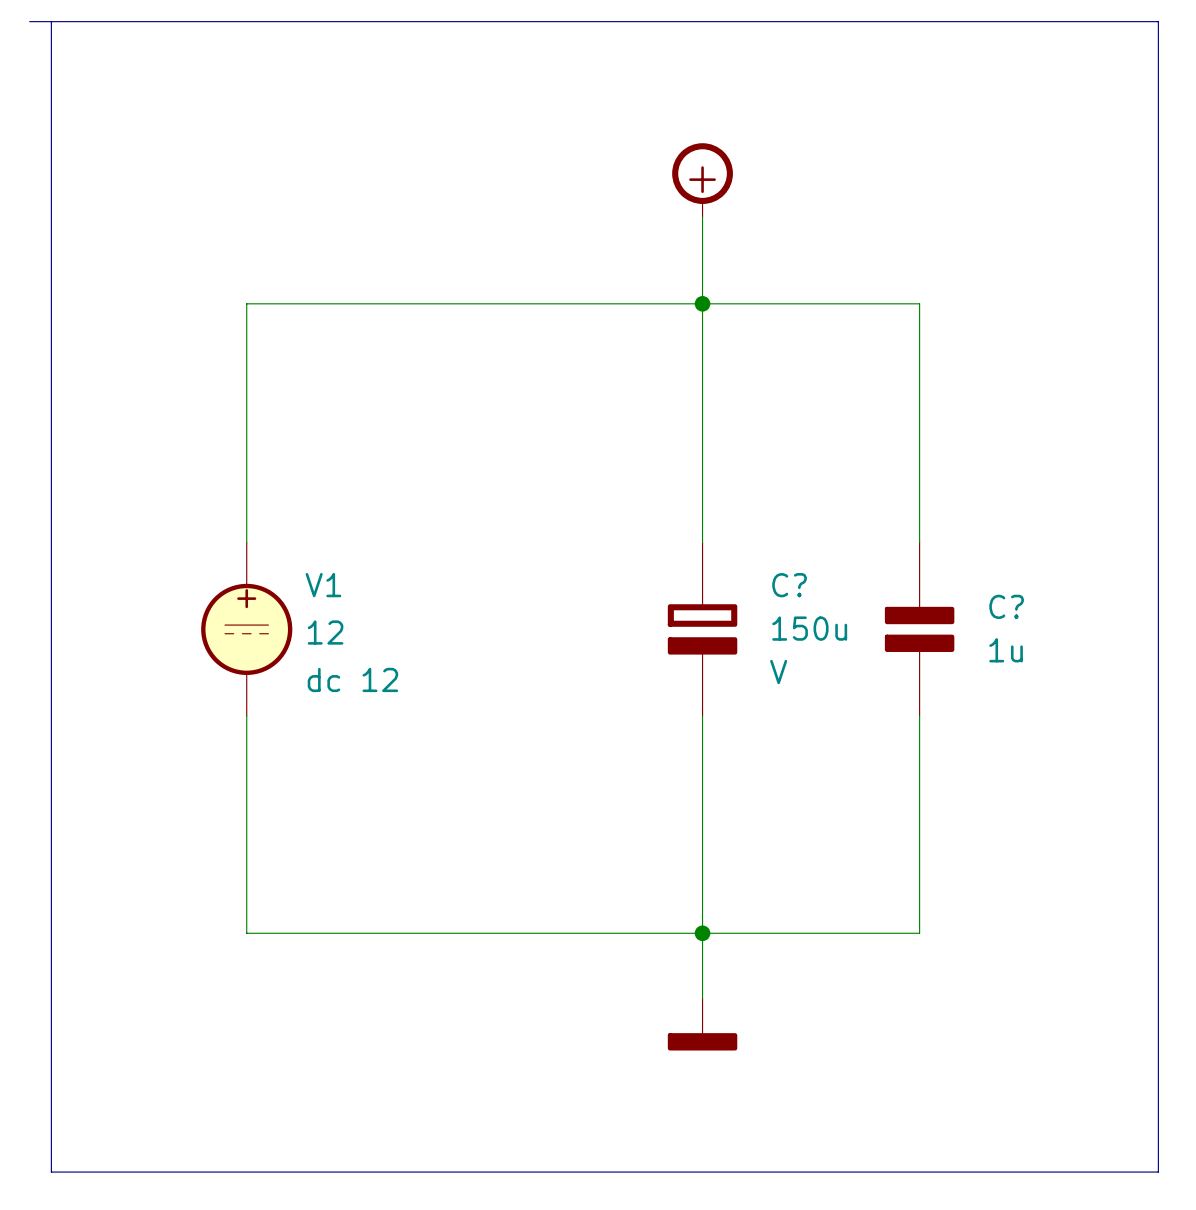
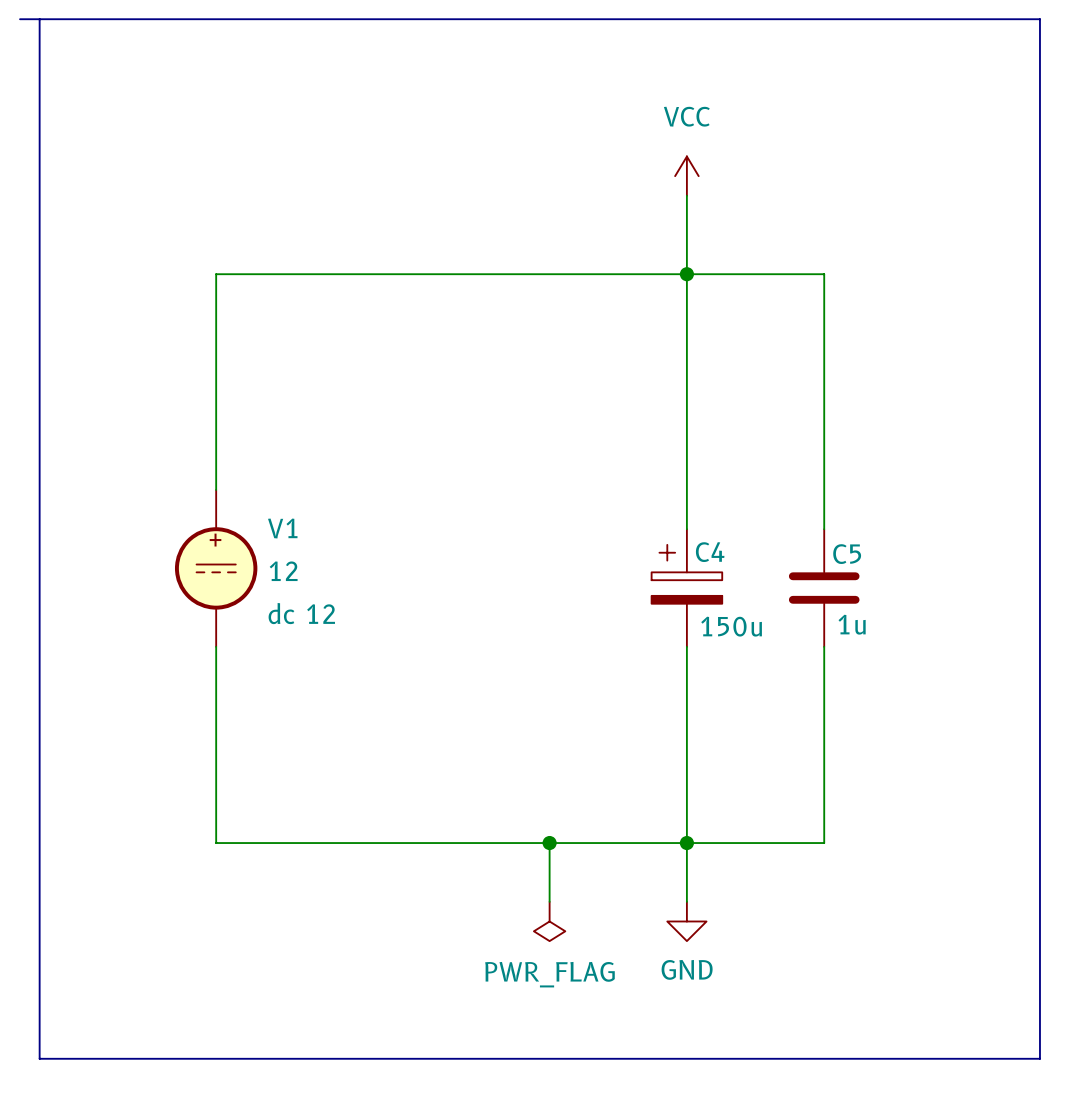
power symbol: (702, 180) -> none
power symbol: none -> VCC (686, 176)
wire: (702, 216) (702, 542) -> none
wire: none -> (686, 195) (686, 529)
junction position: (702, 303) -> (686, 274)
C?: 150u (702, 629) -> none
C?: 1u (919, 629) -> none
C4: none -> 150u (686, 588)
C5: none -> 1u (824, 588)
wire: (702, 716) (702, 998) -> (686, 646) (686, 901)
wire: none -> (549, 843) (549, 901)
junction: none -> (549, 843)
junction: (702, 933) -> none
junction: none -> (686, 843)
power symbol: none -> PWR_FLAG (549, 921)
power symbol: none -> GND (686, 921)
power symbol: (702, 1024) -> none

